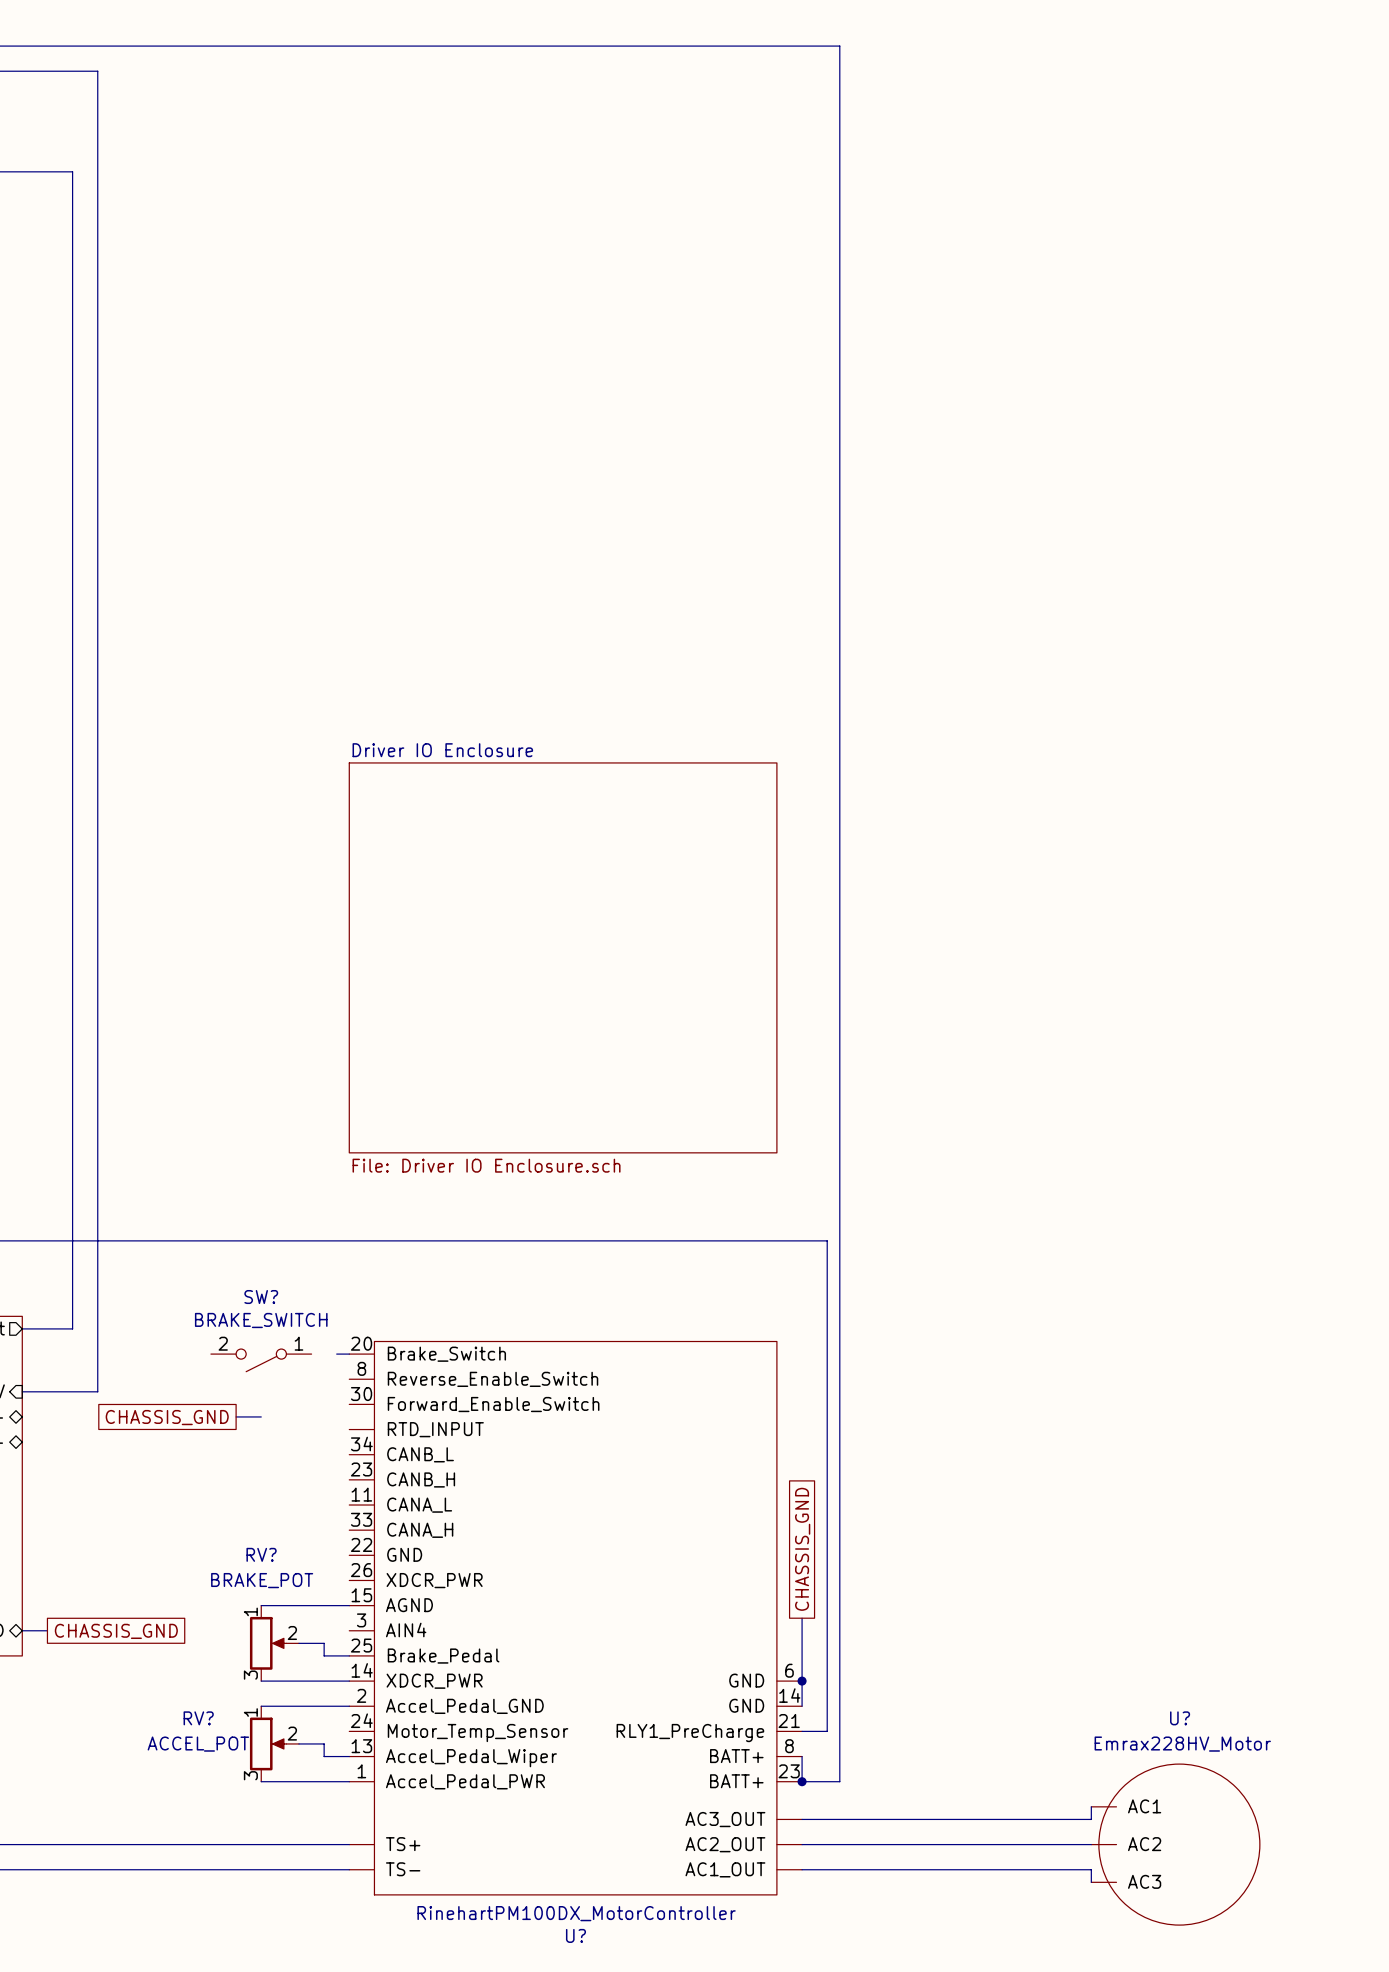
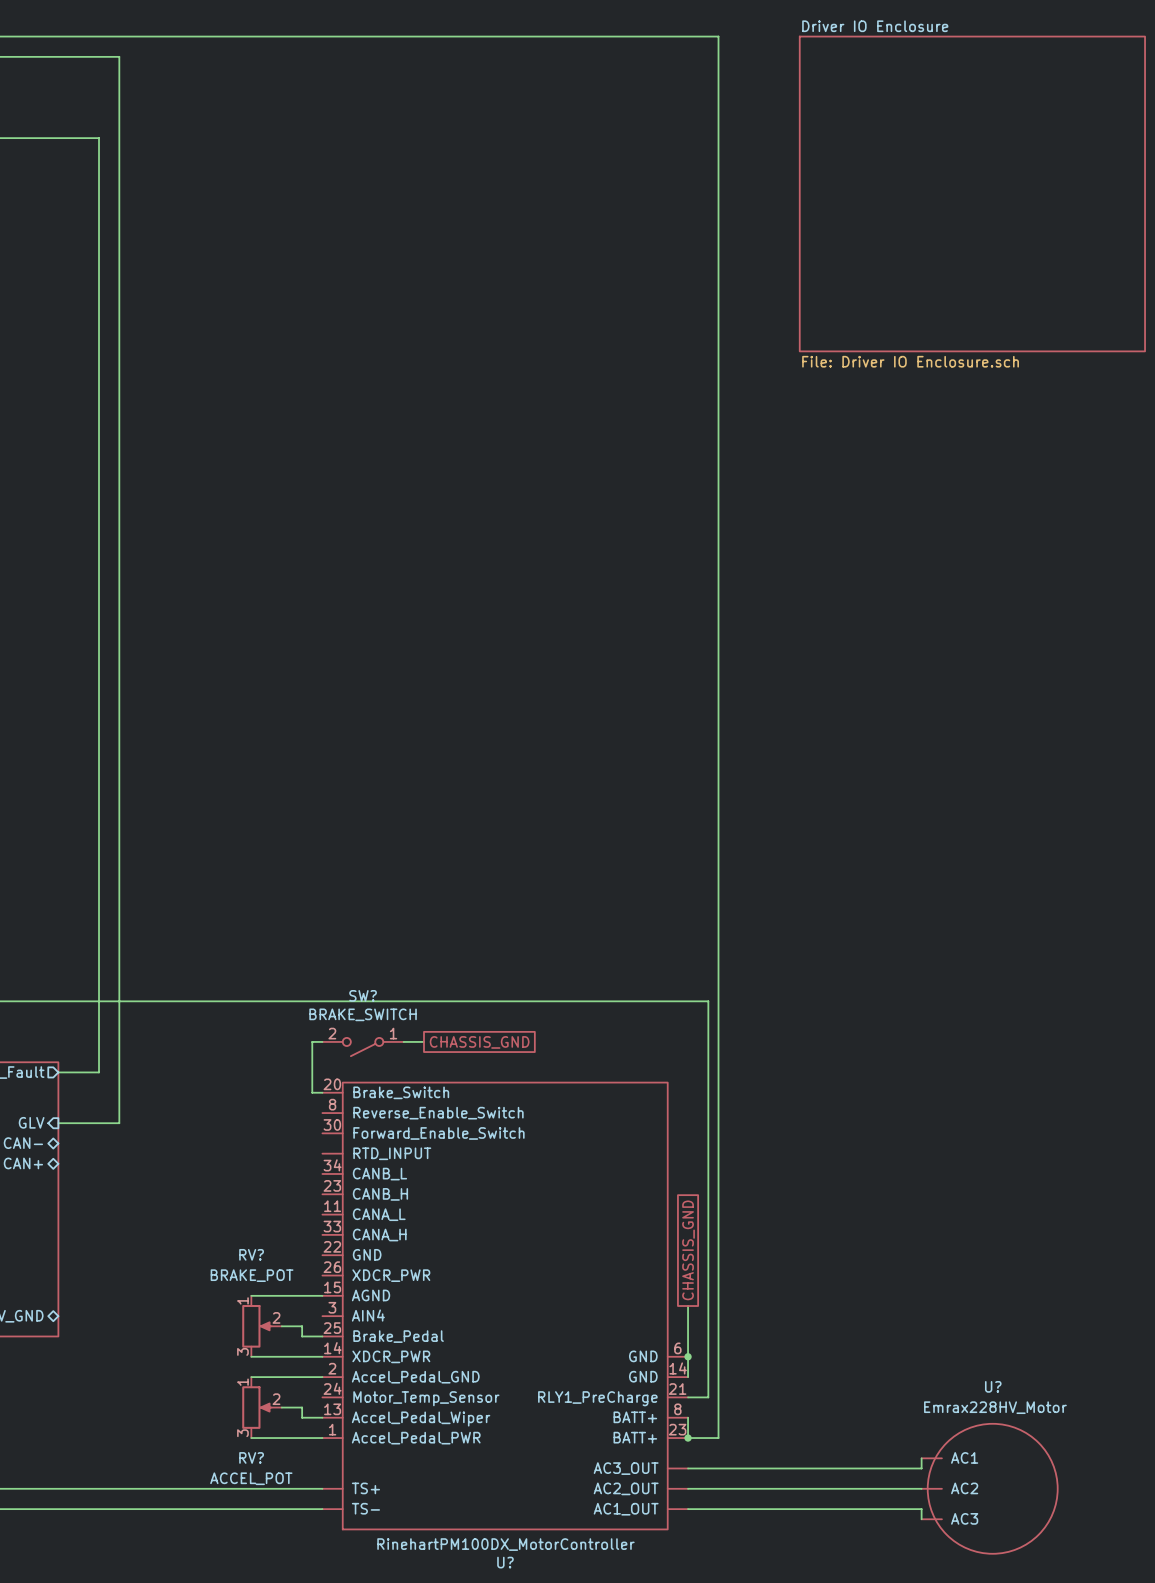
sheet Driver IO Enclosure: none -> File: Driver IO Enclosure.sch (972, 193)
sheet Driver IO Enclosure: File: Driver IO Enclosure.sch (563, 957) -> none
wire: none -> (322, 1041) (312, 1041) (312, 1092)
wire: none -> (403, 1041) (423, 1041)
global label: none -> CHASSIS_GND (479, 1042)
SW? position: (261, 1360) -> (363, 1047)
wire: (236, 1416) (261, 1416) -> none
global label: CHASSIS_GND (167, 1417) -> none
wire: (22, 1630) (47, 1630) -> none
global label: CHASSIS_GND (116, 1631) -> none
RV? name position: RV? (198, 1718) -> RV? (251, 1457)
RV? value position: ACCEL_POT (198, 1744) -> ACCEL_POT (251, 1478)

